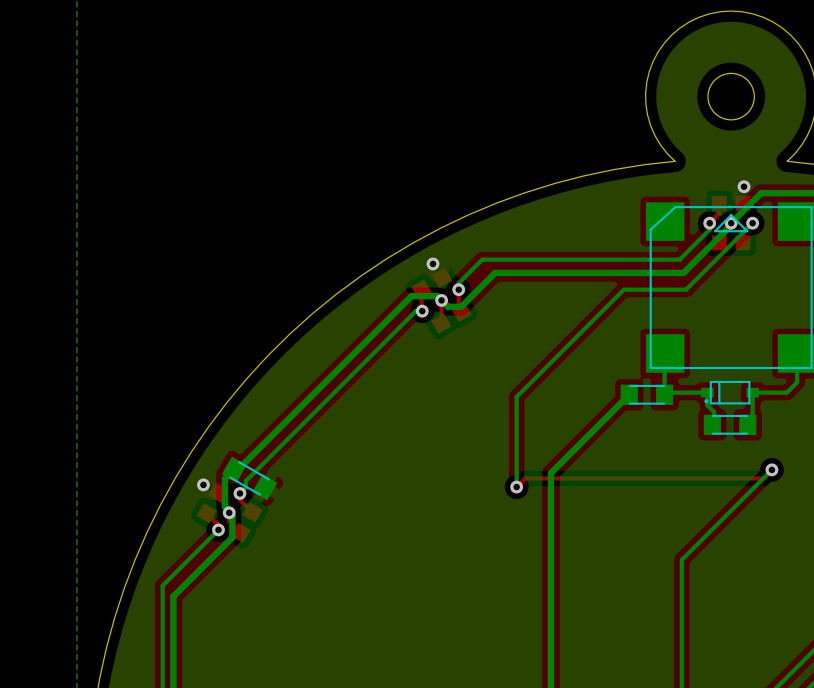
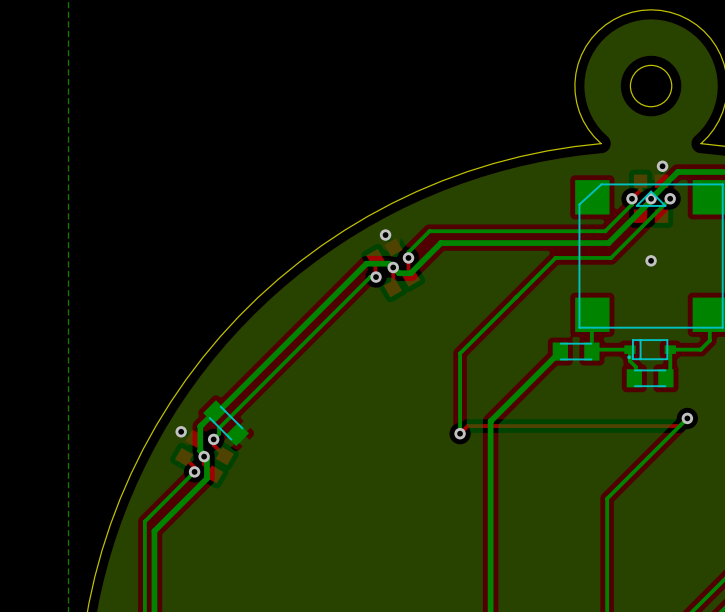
via: none -> (651, 260)
part rotation: 0° (249, 478) -> 15° clockwise (226, 423)

